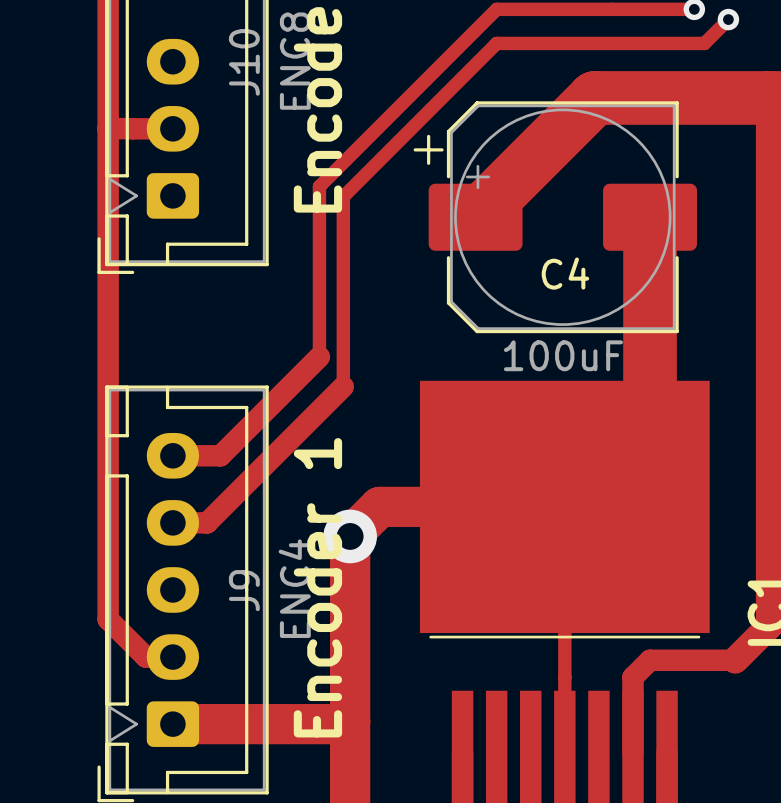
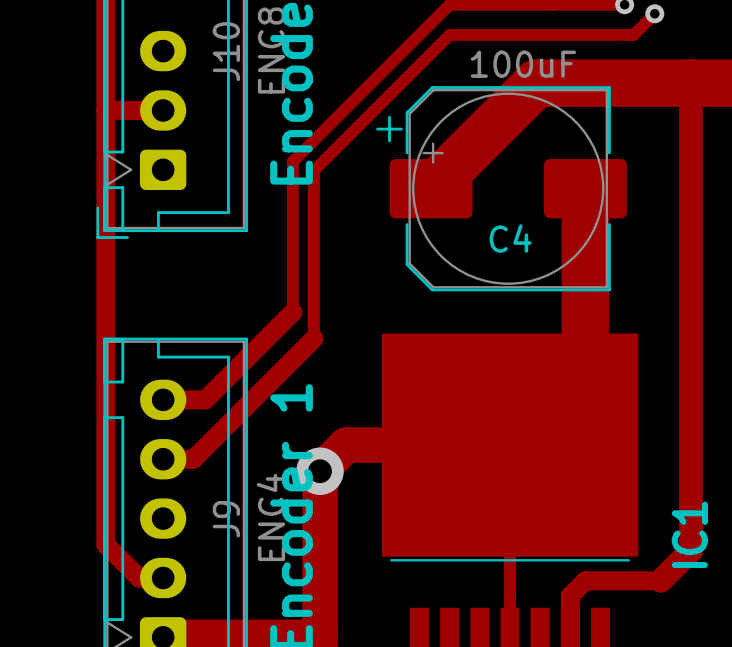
C4 value position: 100uF (563, 355) -> 100uF (523, 64)

